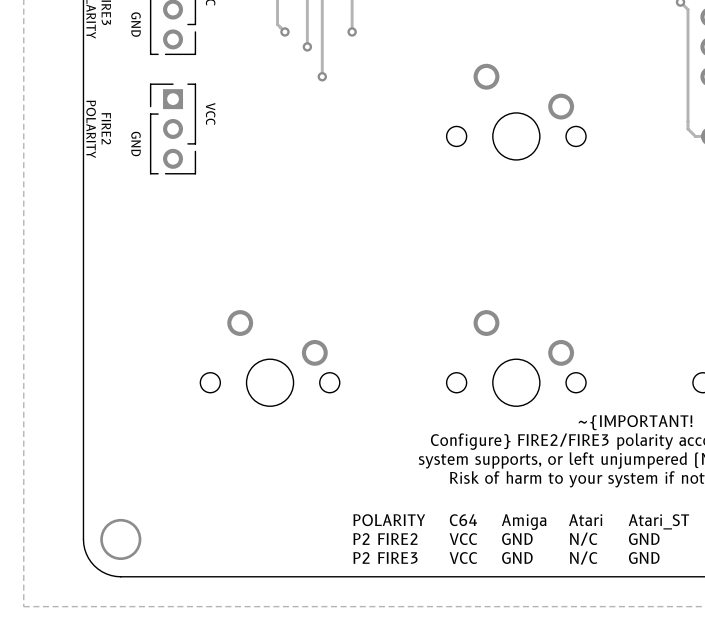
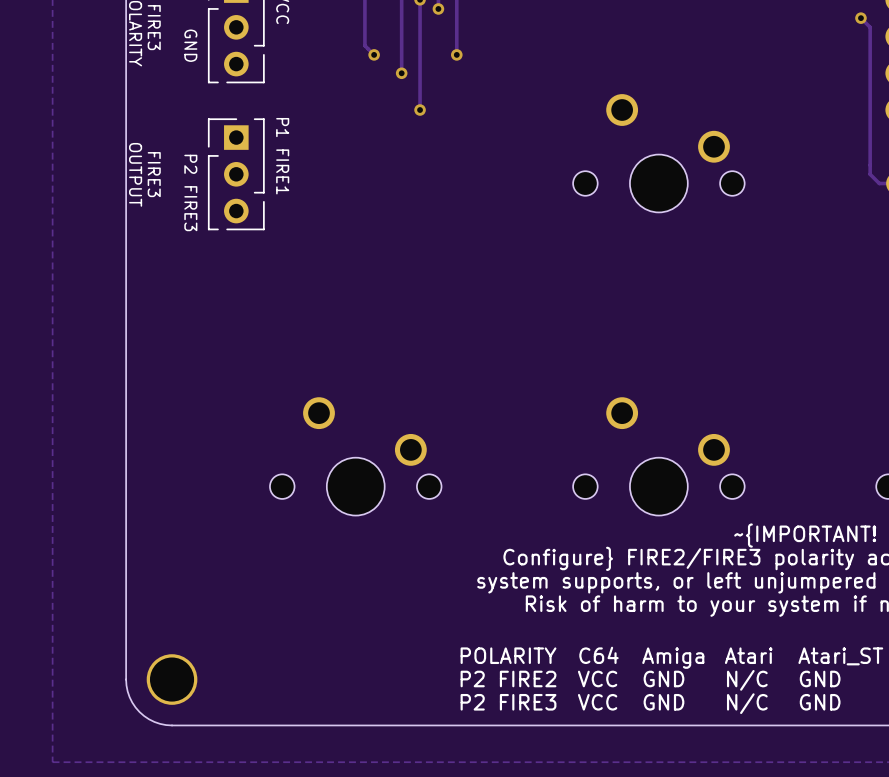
text: VCC (210, 114) -> P1 FIRE1 (282, 156)
text: FIRE2 (106, 128) -> FIRE3 (154, 174)
text: POLARITY (91, 129) -> OUTPUT (135, 174)
text: GND (136, 143) -> P2 FIRE3 (190, 192)

